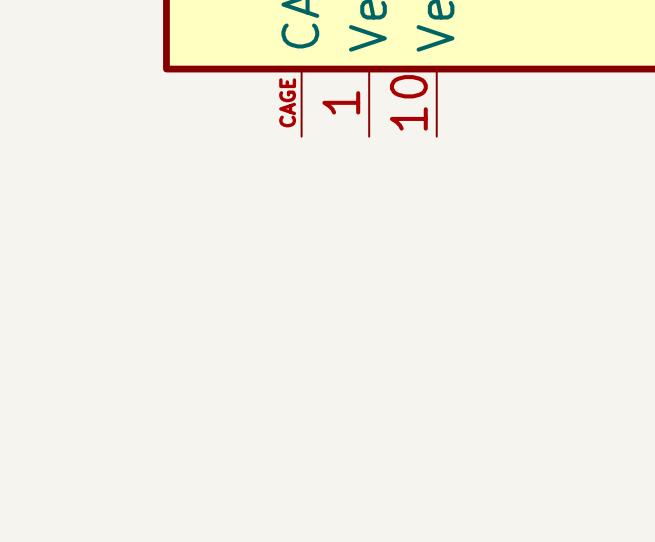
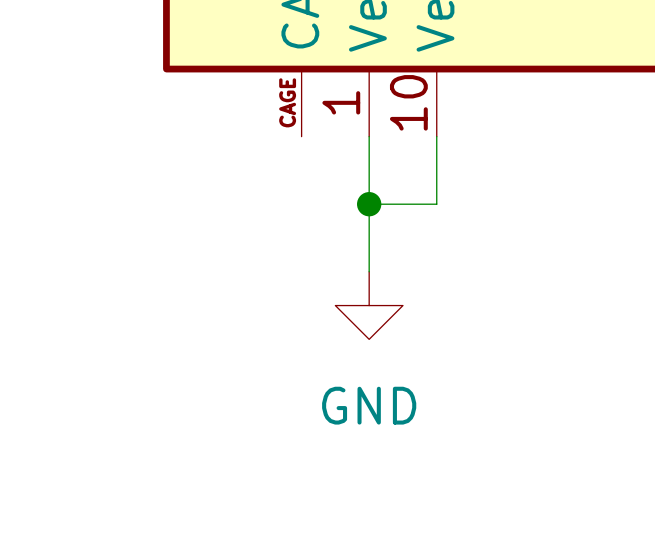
wire: none -> (369, 136) (369, 271)
wire: none -> (436, 136) (436, 204) (369, 204)
junction: none -> (369, 204)
power symbol: none -> GND (369, 305)

